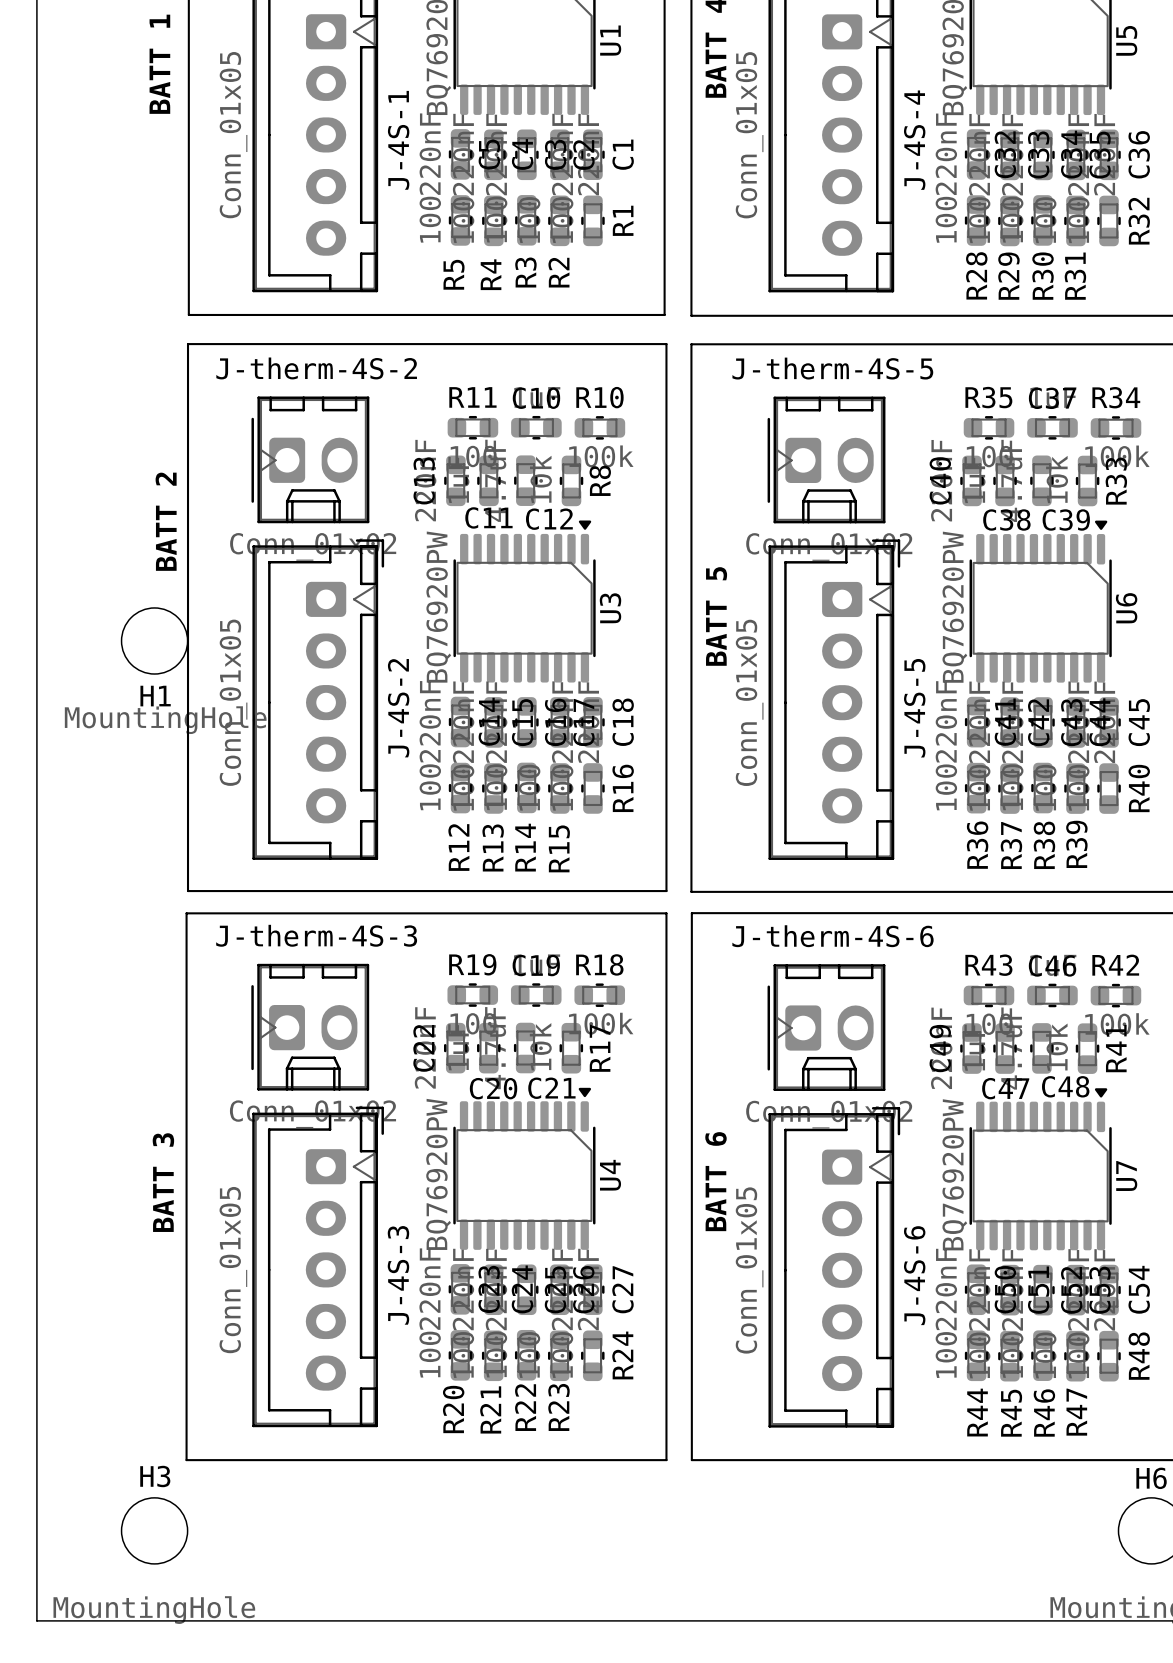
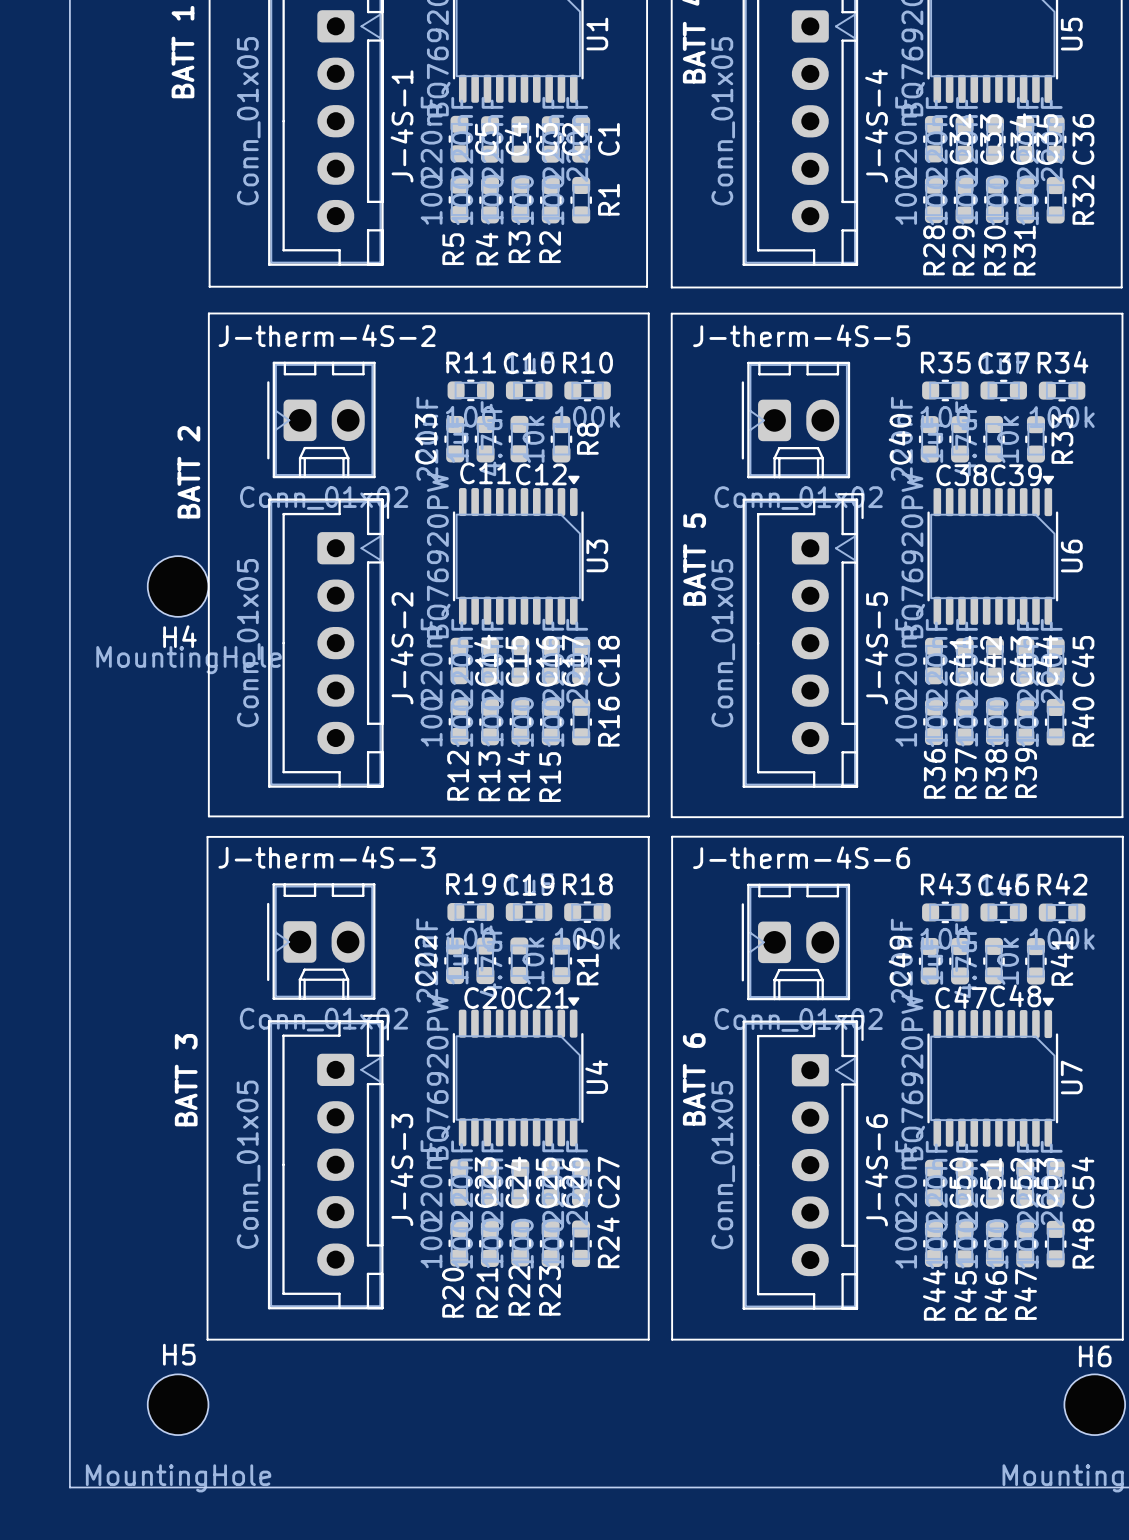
H1 name: H1 (155, 696) -> H4 (179, 636)
H3 name: H3 (155, 1476) -> H5 (179, 1354)

